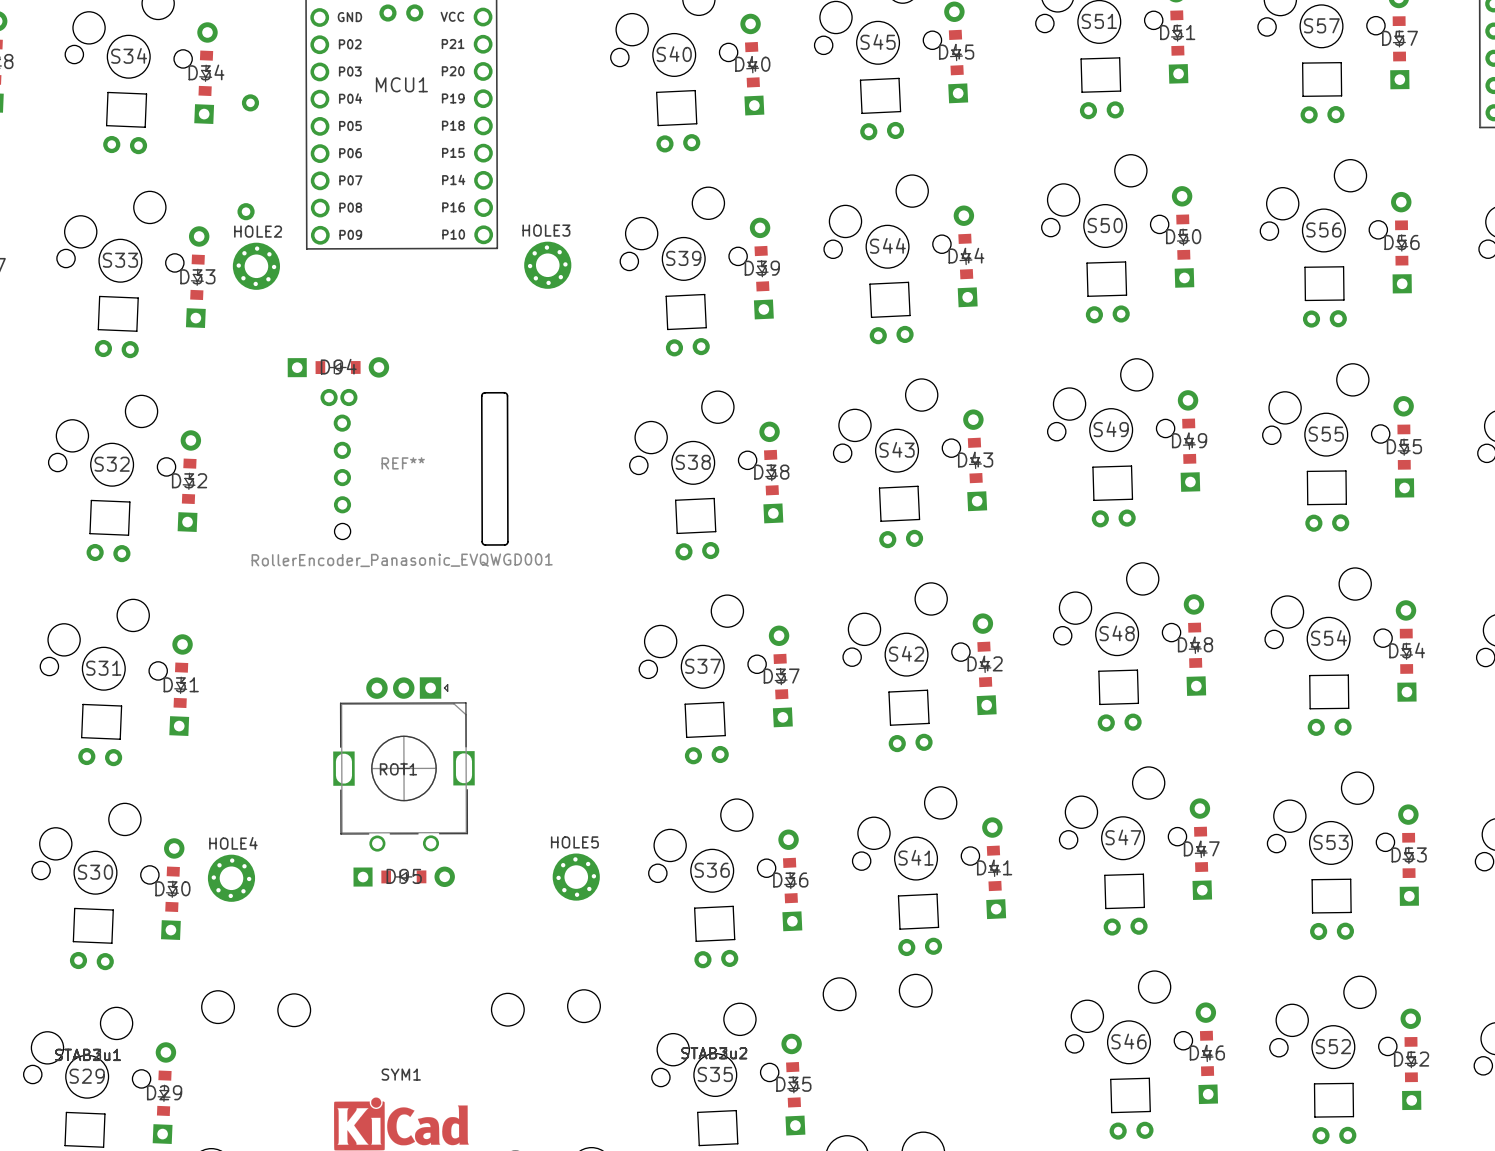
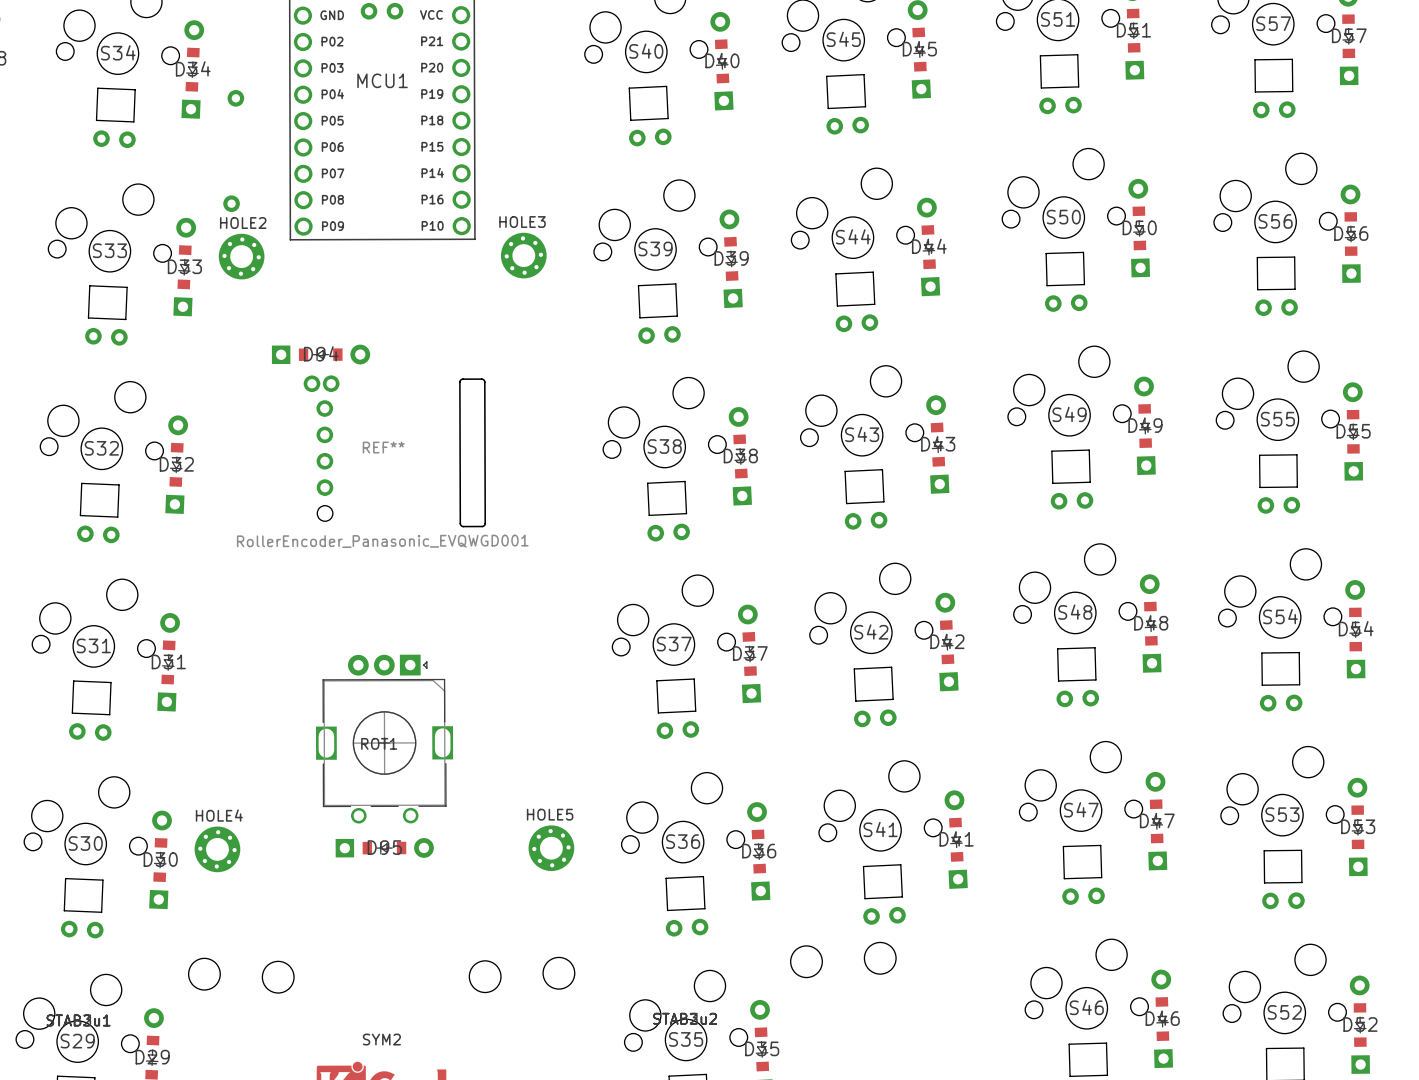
SYM1 name: SYM1 (401, 1074) -> SYM2 (381, 1039)

